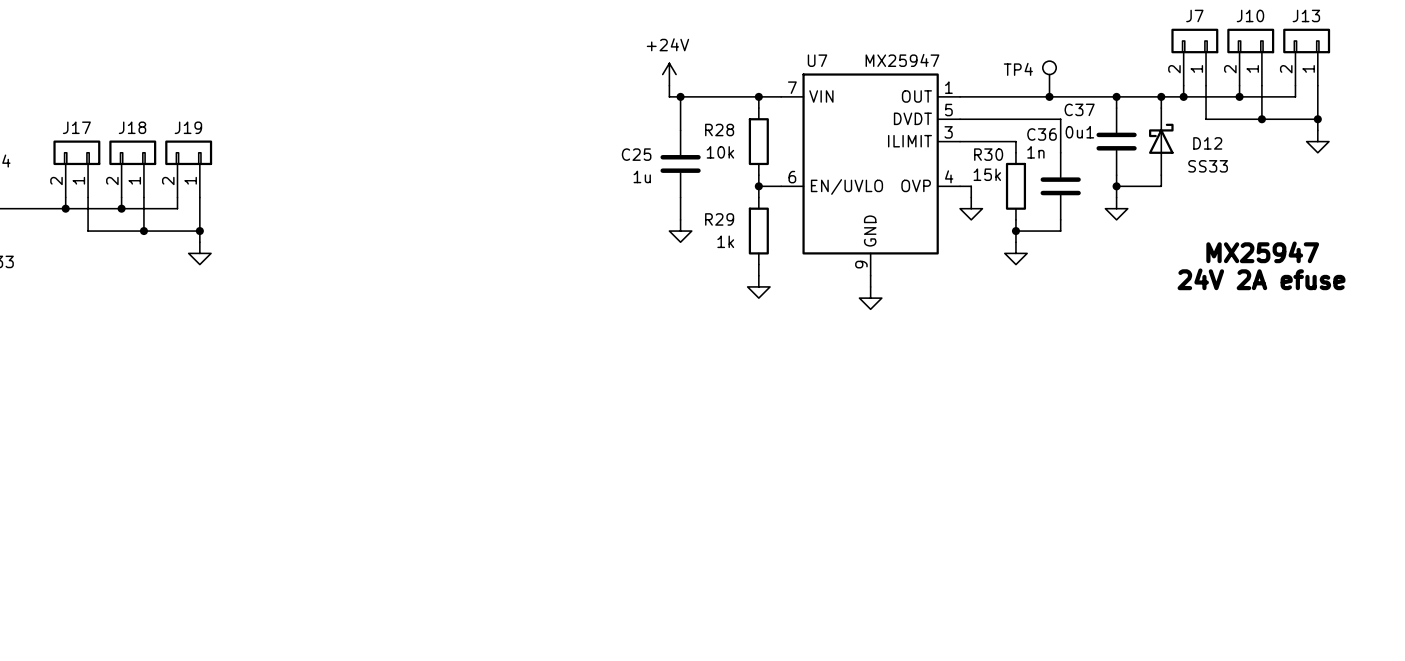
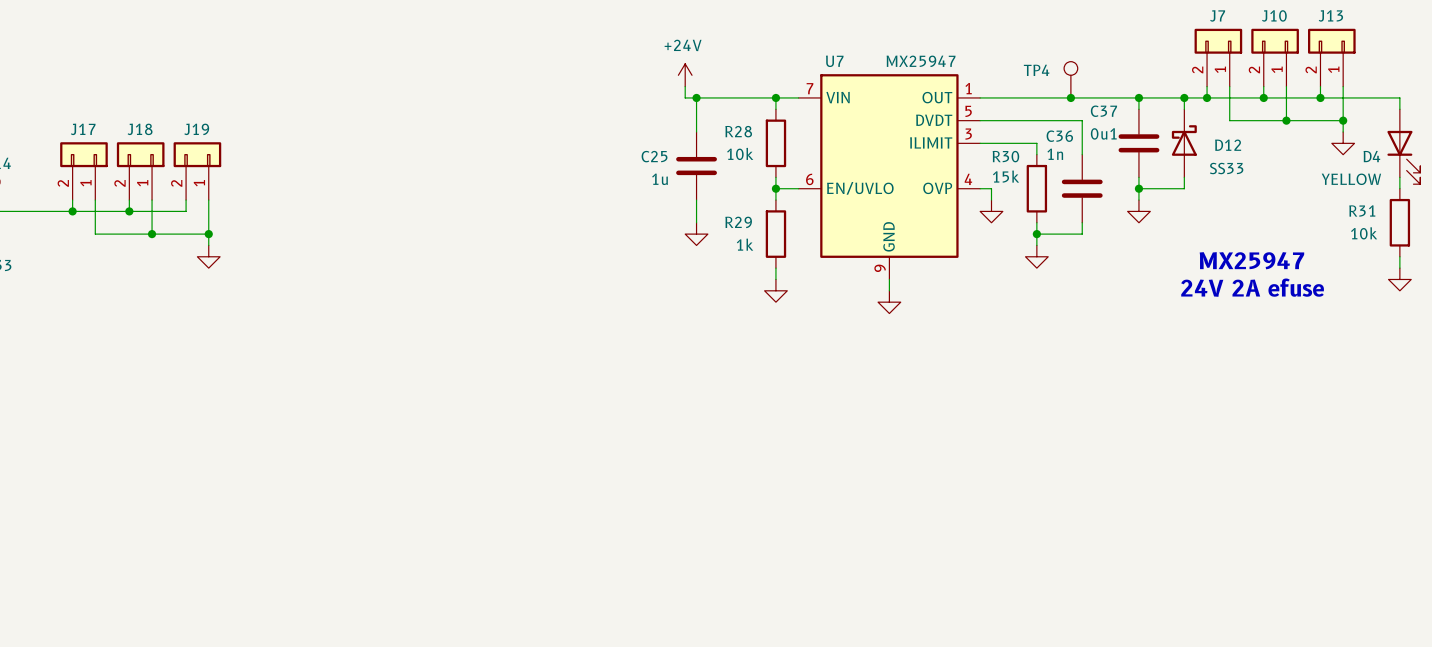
wire: none -> (1320, 97) (1399, 97) (1399, 109)
junction: none -> (1320, 97)
D4: none -> YELLOW (1403, 146)
wire: none -> (1399, 177) (1399, 188)
R31: none -> 10k (1399, 222)
text position: MX25947 (1262, 252) -> MX25947 (1251, 260)
wire: none -> (1399, 256) (1399, 268)
power symbol: none -> (1399, 279)
text position: 24V 2A efuse (1261, 279) -> 24V 2A efuse (1252, 287)

